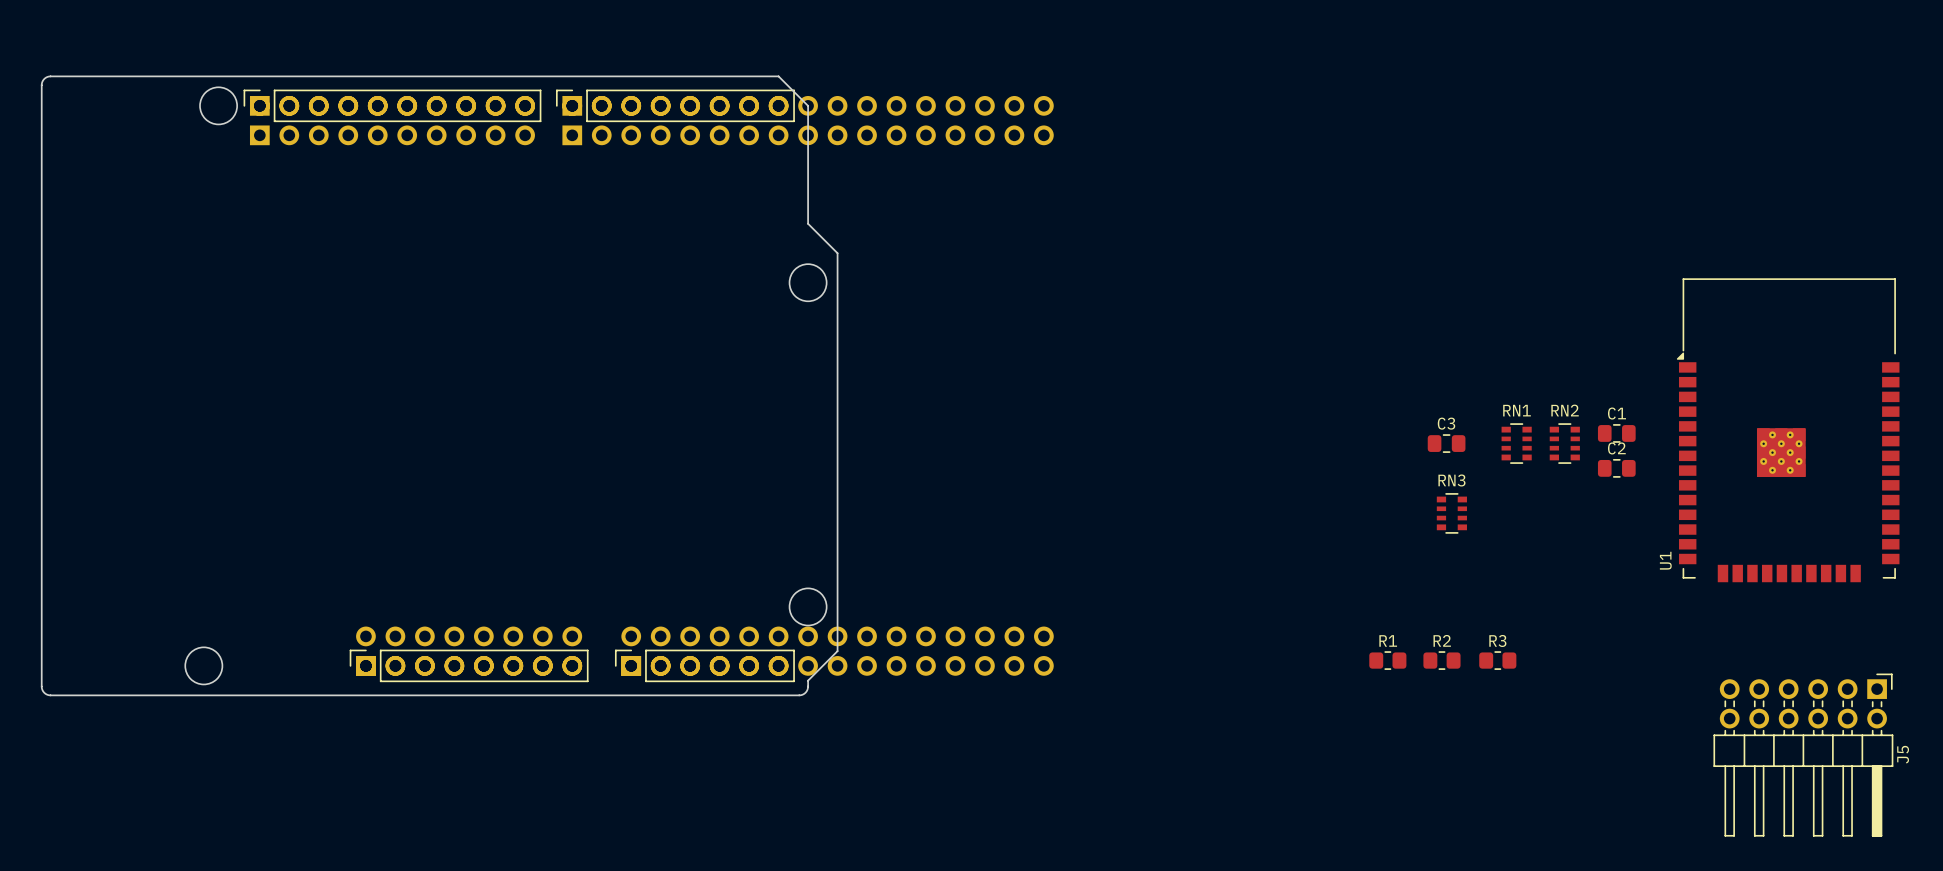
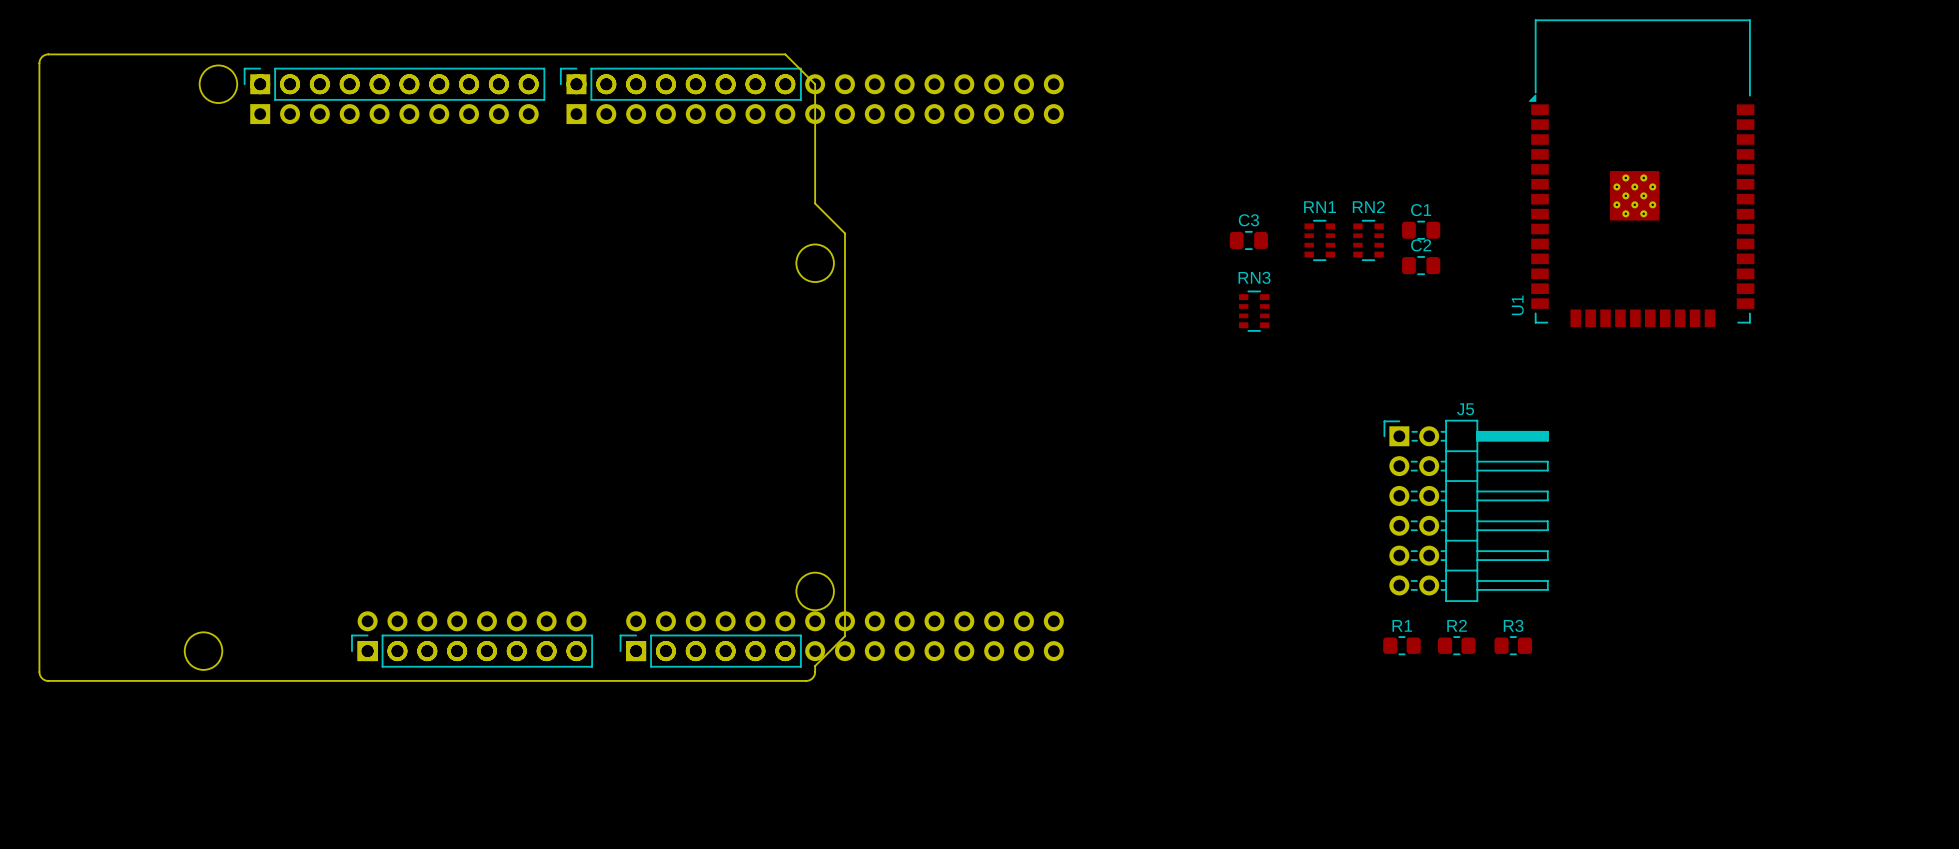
U1 position: (1788, 430) -> (1641, 173)
C1 position: (1616, 433) -> (1421, 230)
C3 position: (1446, 443) -> (1248, 240)
RN1 position: (1516, 443) -> (1319, 240)
RN2 position: (1564, 443) -> (1368, 240)
C2 position: (1616, 468) -> (1421, 265)
RN3 position: (1451, 513) -> (1254, 311)
J5 rotation: 0° (1803, 755) -> 90° counterclockwise (1466, 510)
J5 position: (1803, 755) -> (1466, 510)

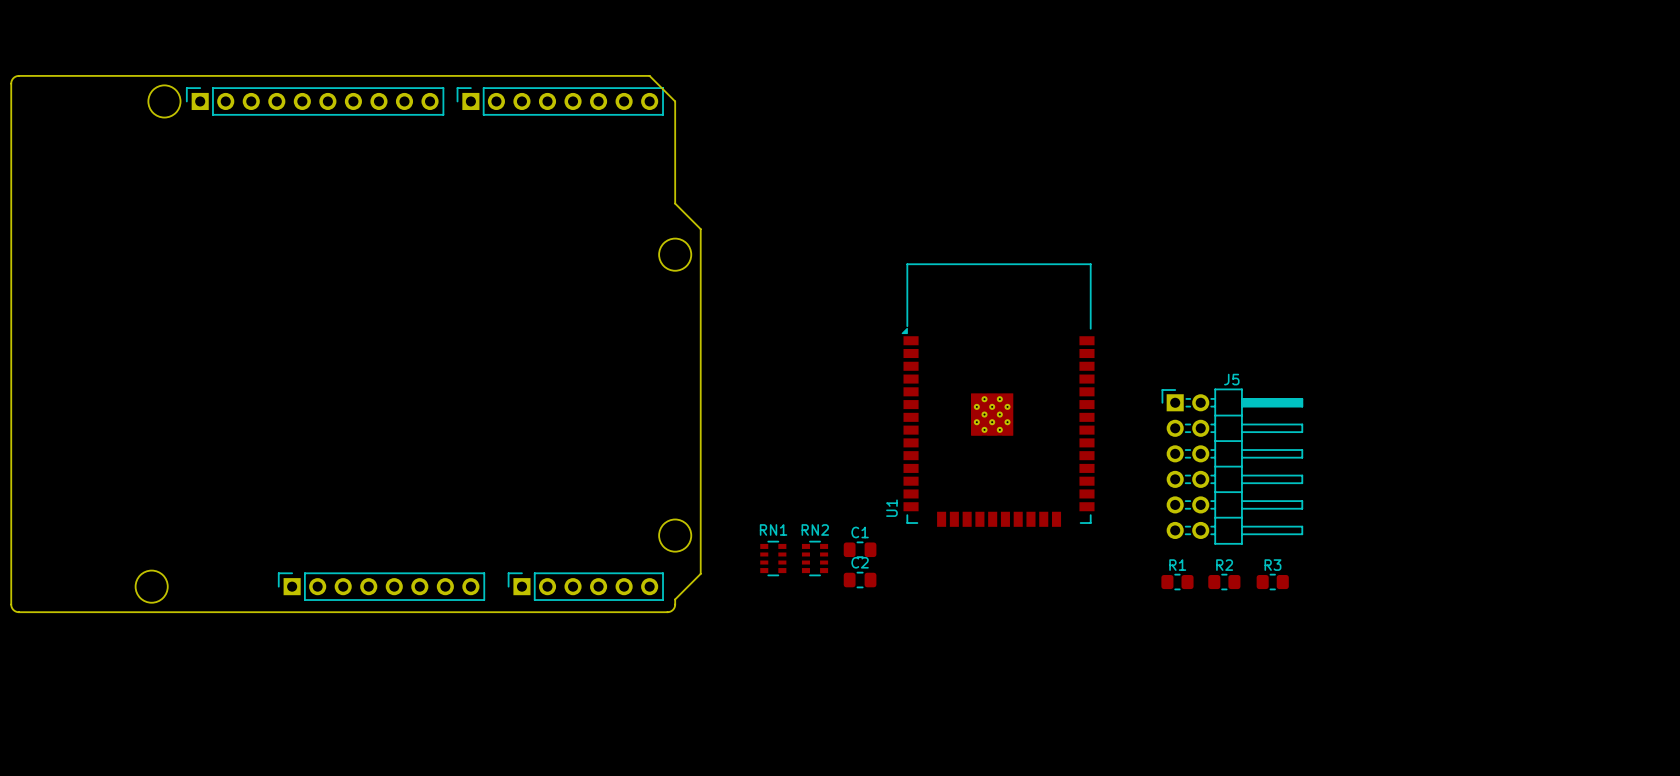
part: (394, 99) -> none
part: (815, 99) -> none
U1 position: (1641, 173) -> (998, 395)
C1 position: (1421, 230) -> (860, 549)
C3: (1248, 240) -> none
RN1 position: (1319, 240) -> (773, 558)
RN2 position: (1368, 240) -> (815, 558)
C2 position: (1421, 265) -> (860, 580)
RN3: (1254, 311) -> none
part: (472, 636) -> none
part: (844, 636) -> none

